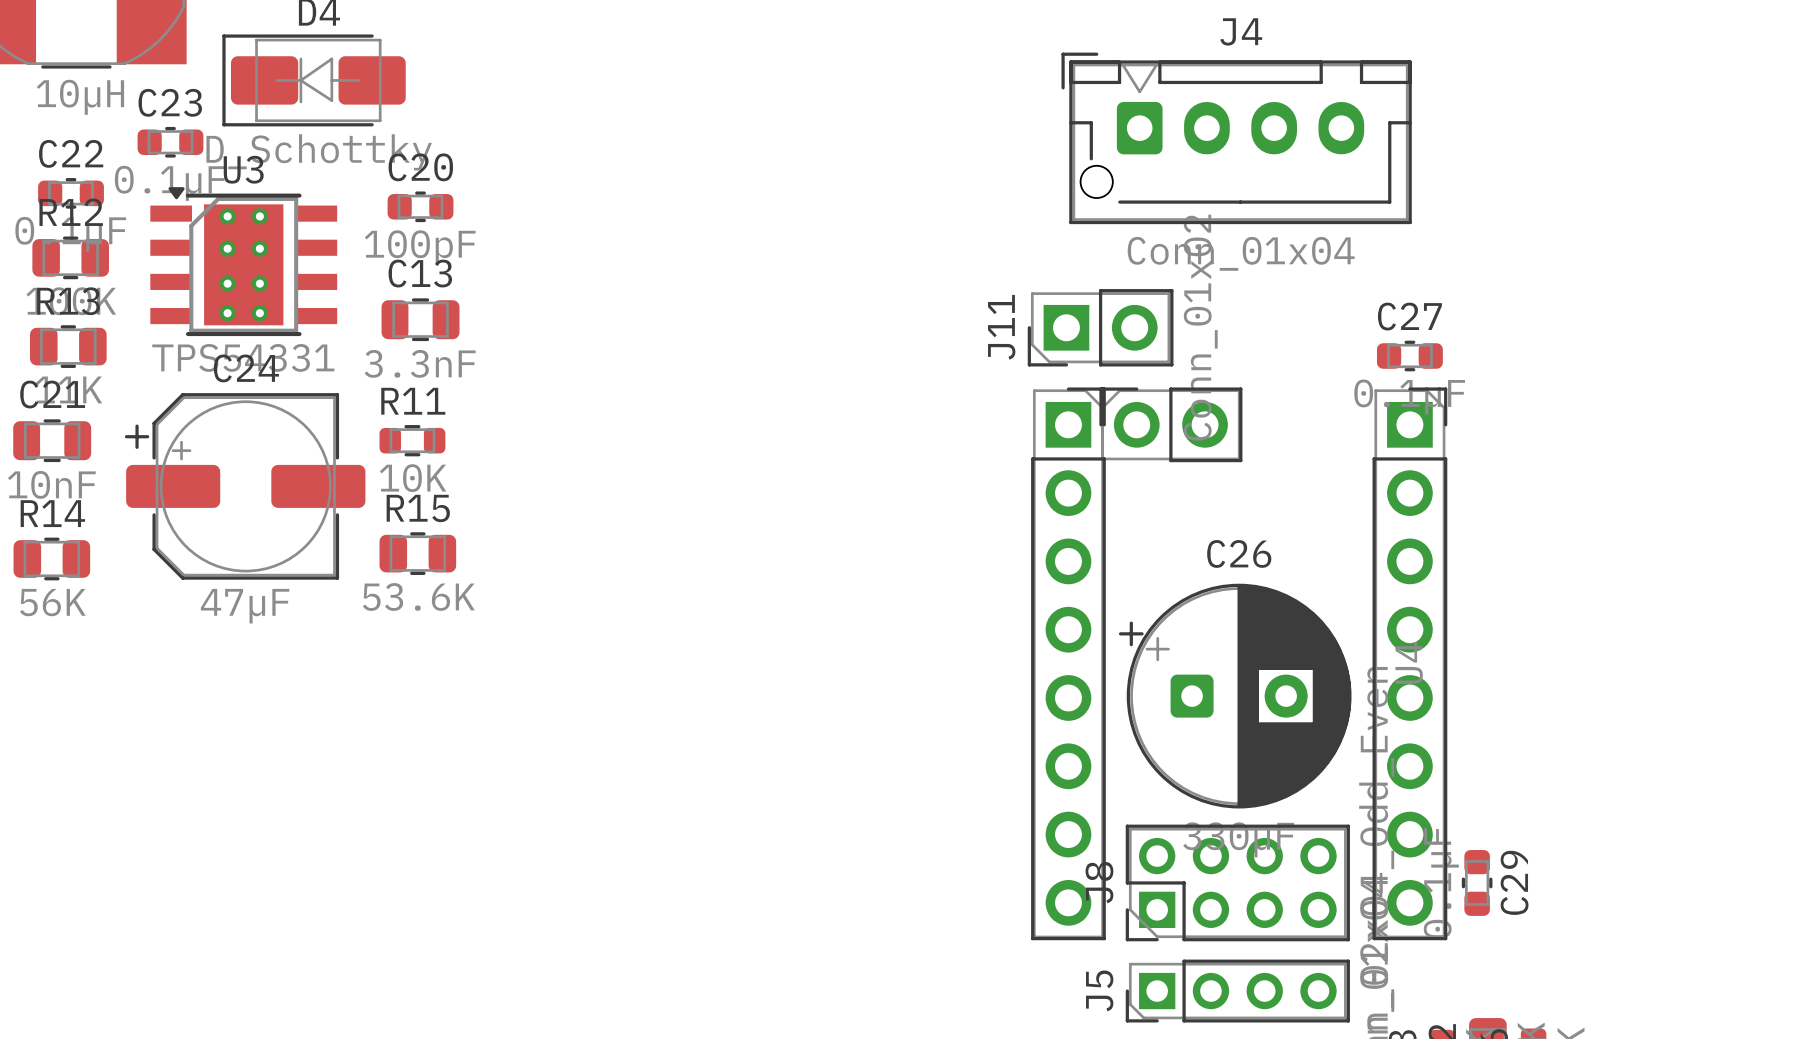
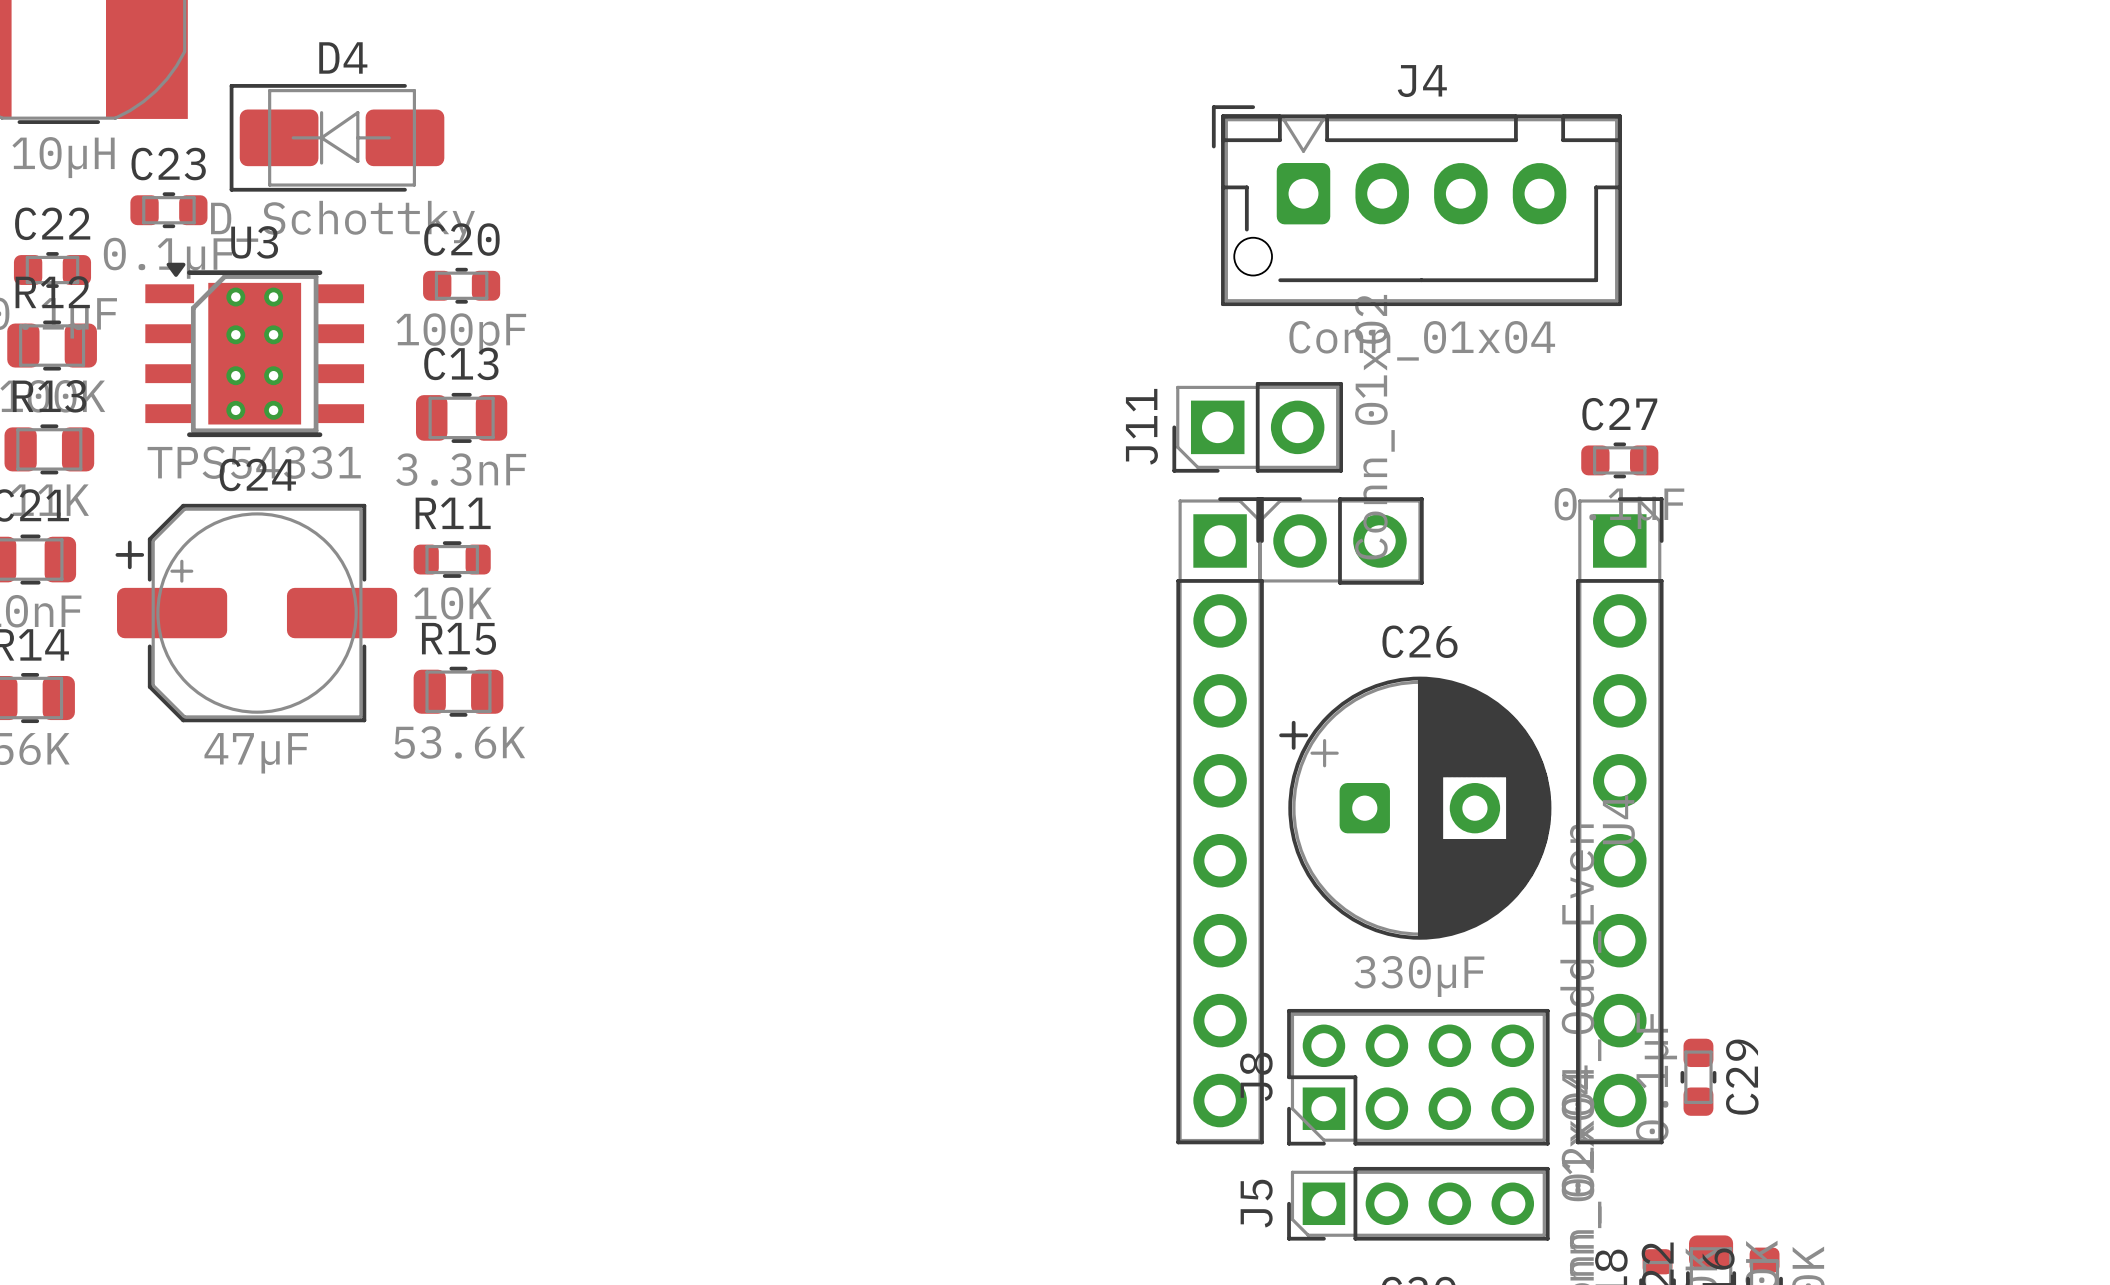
C26 position: (1235, 696) -> (1415, 808)

